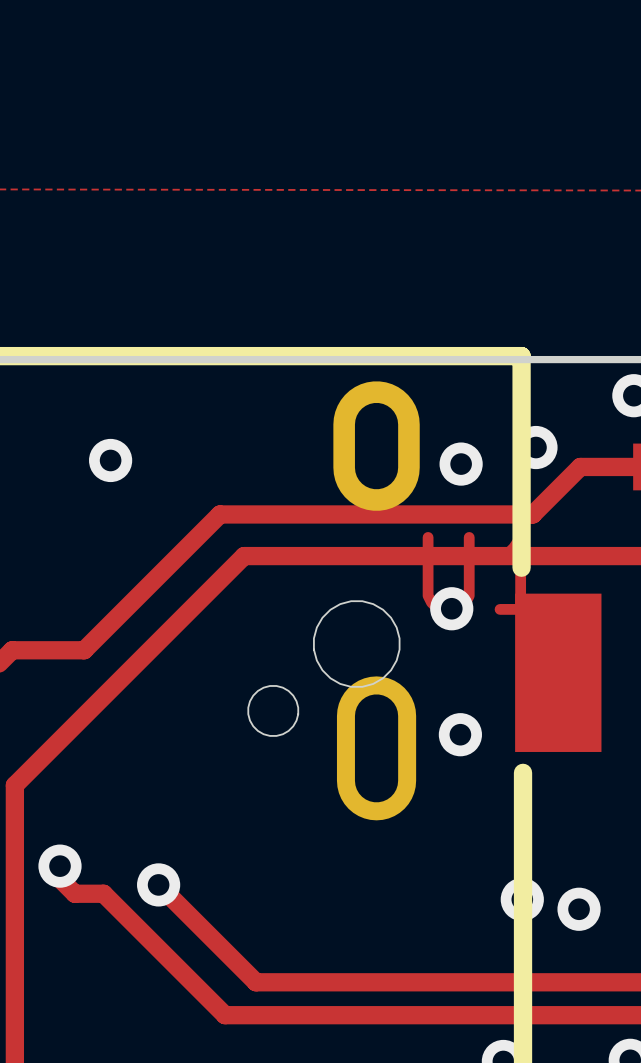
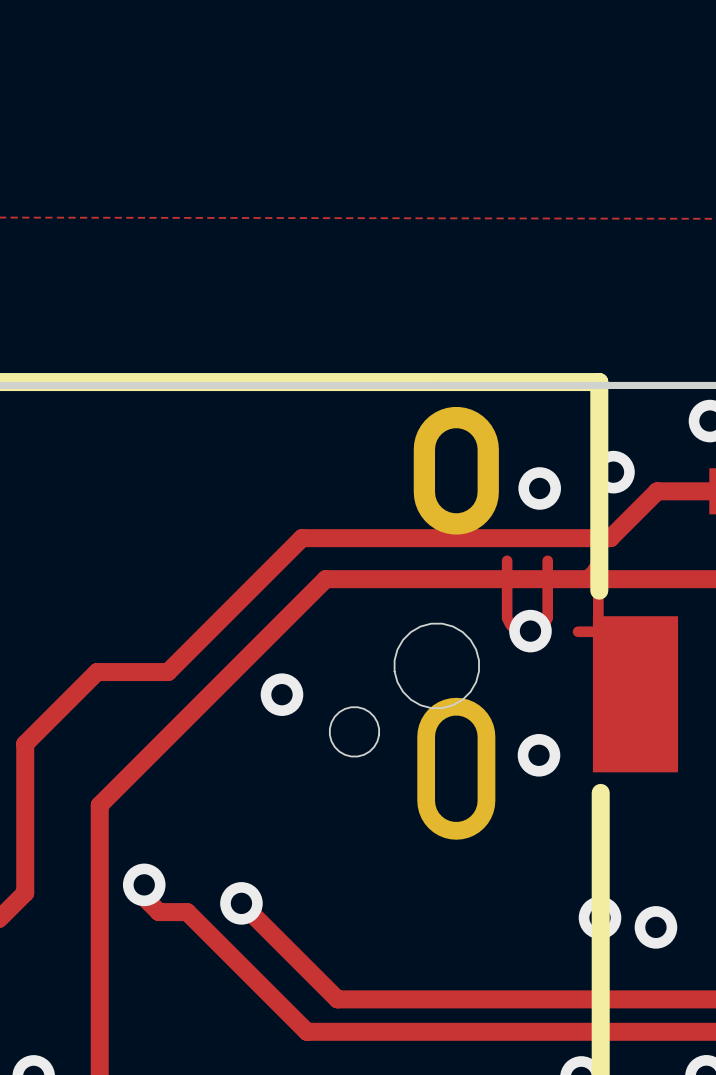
via position: (110, 460) -> (281, 694)

